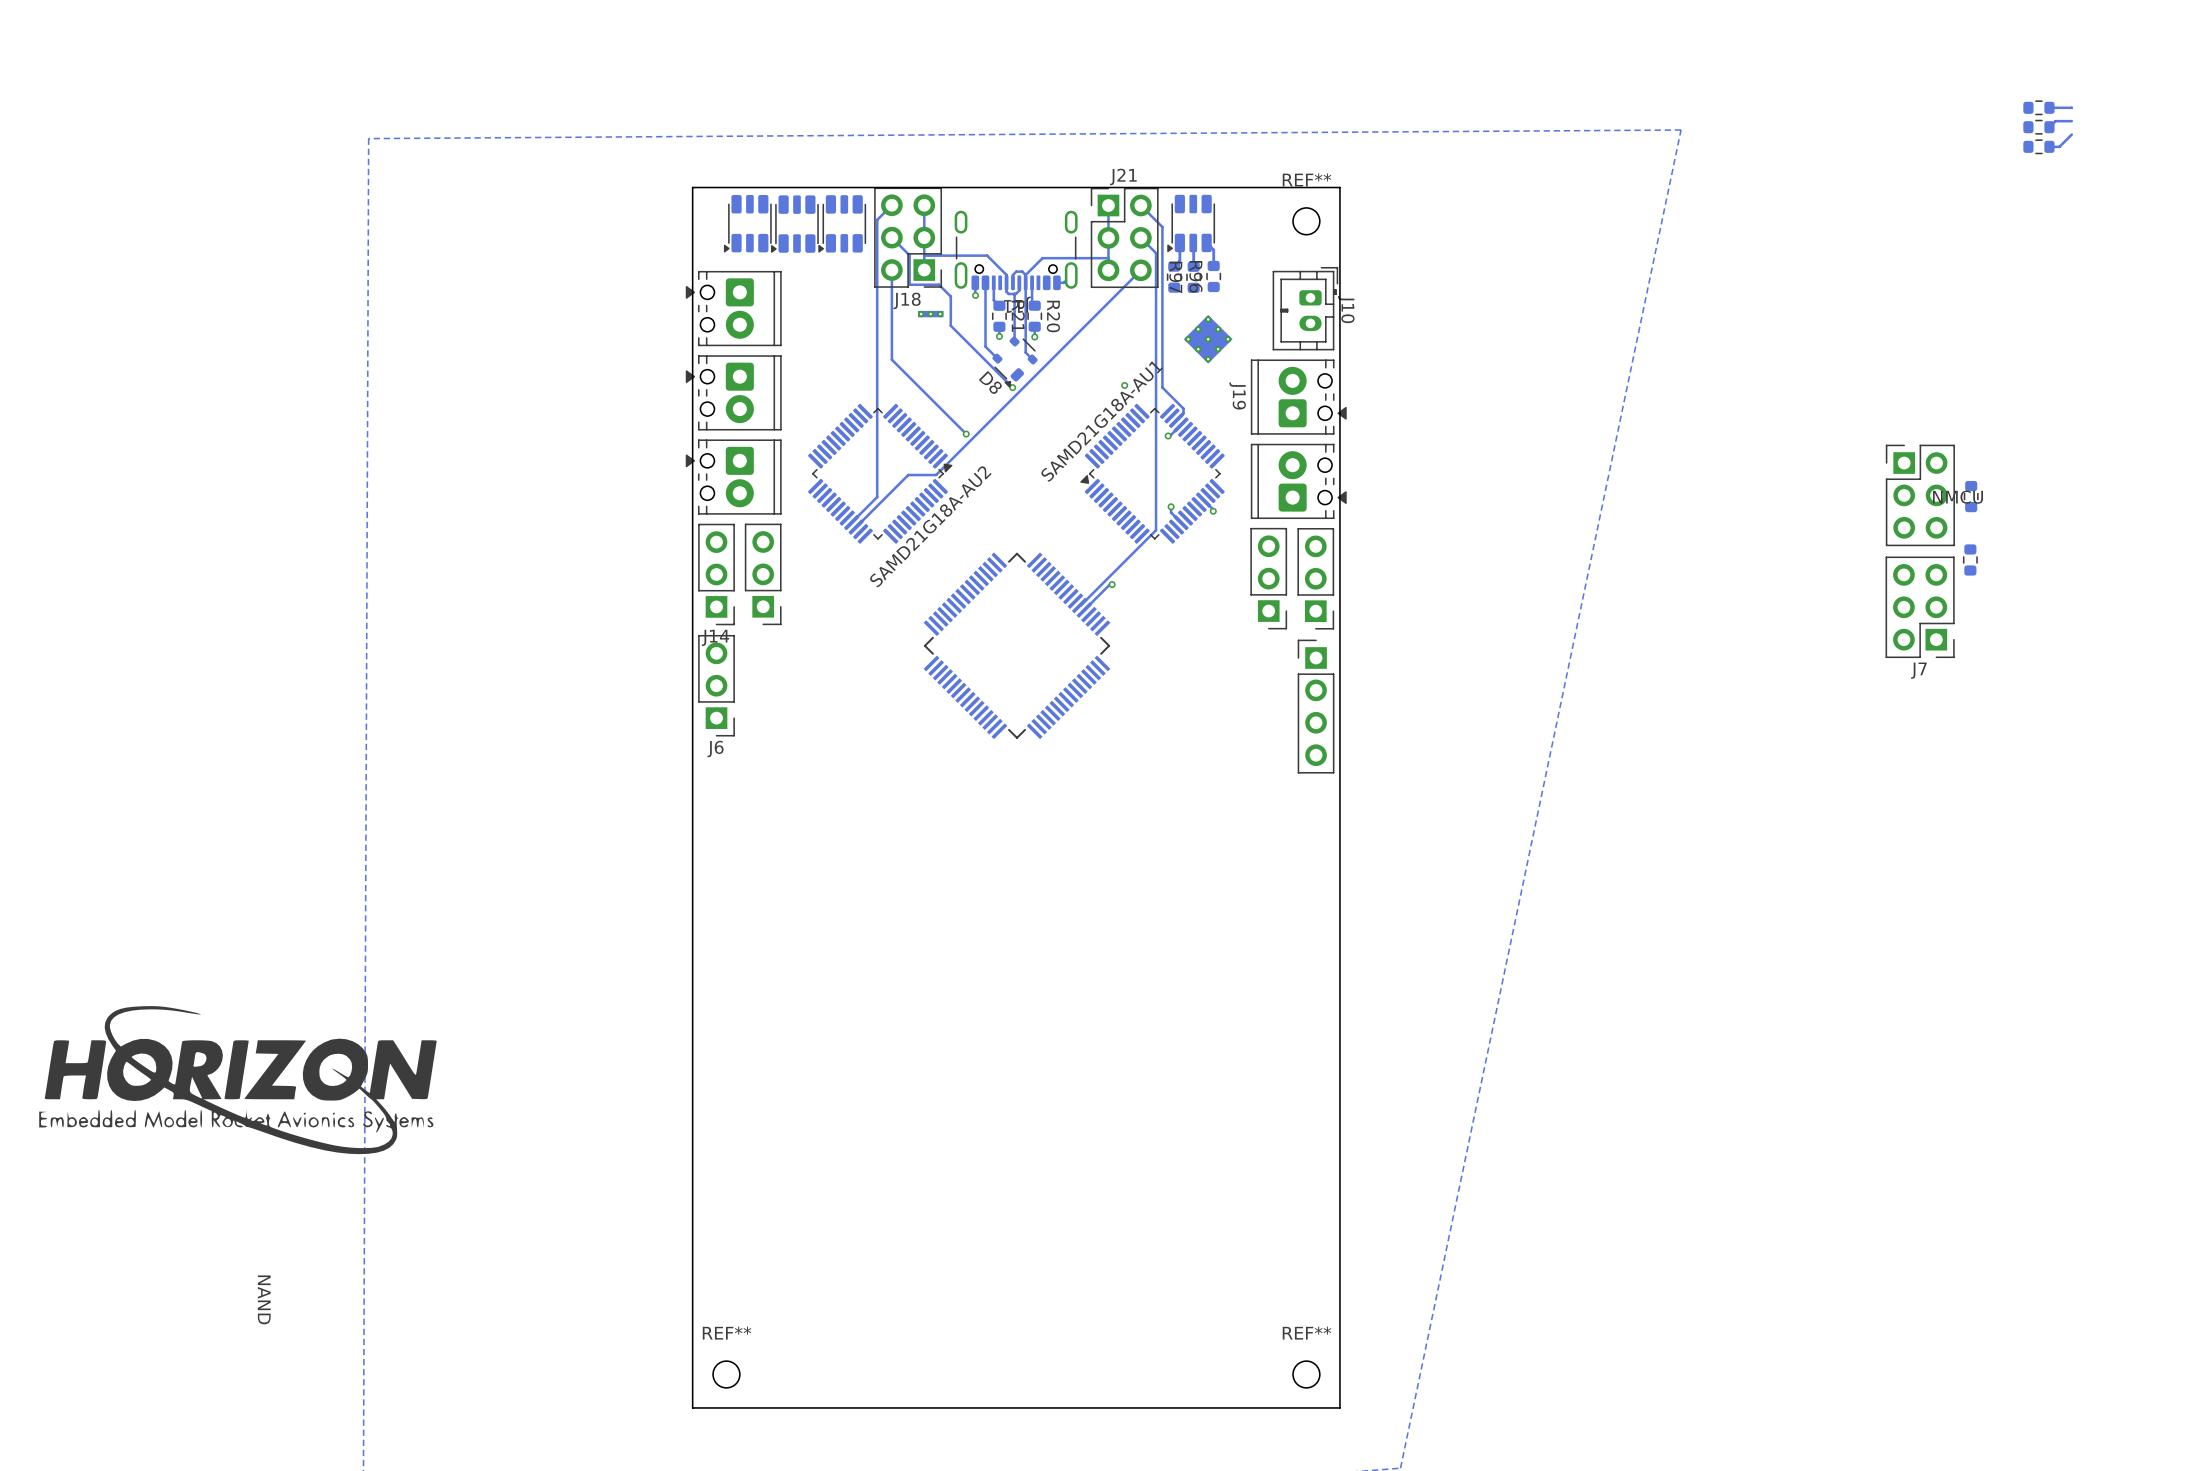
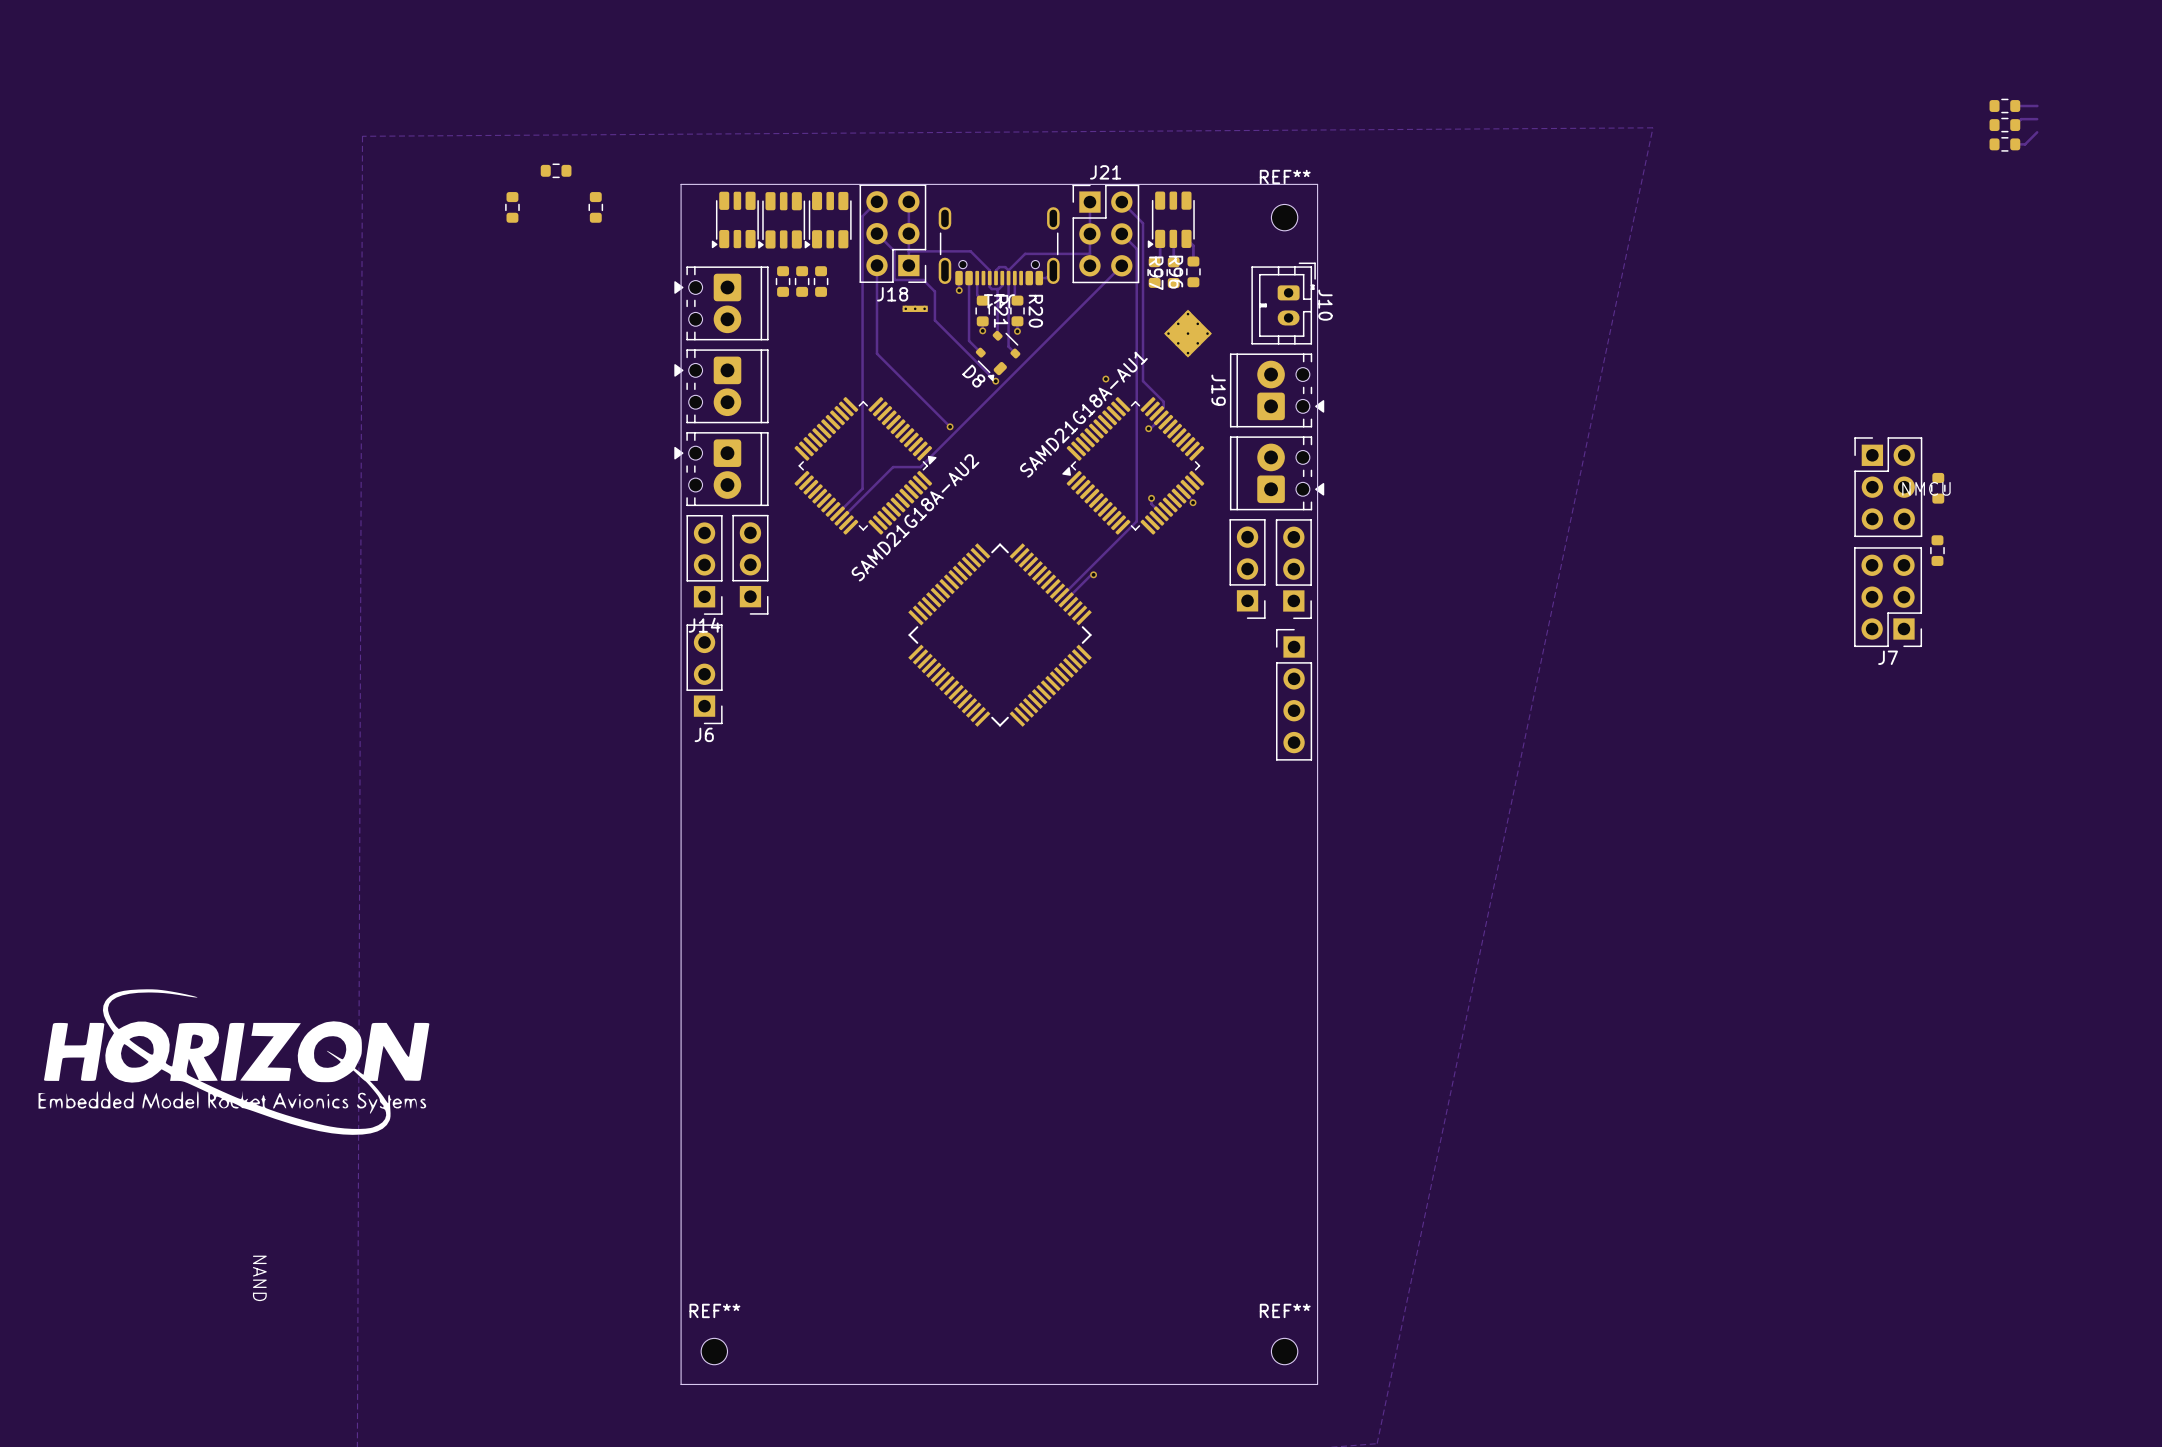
part: none -> (556, 170)
part: none -> (512, 207)
part: none -> (595, 207)
part: none -> (783, 281)
part: none -> (802, 281)
part: none -> (821, 281)

